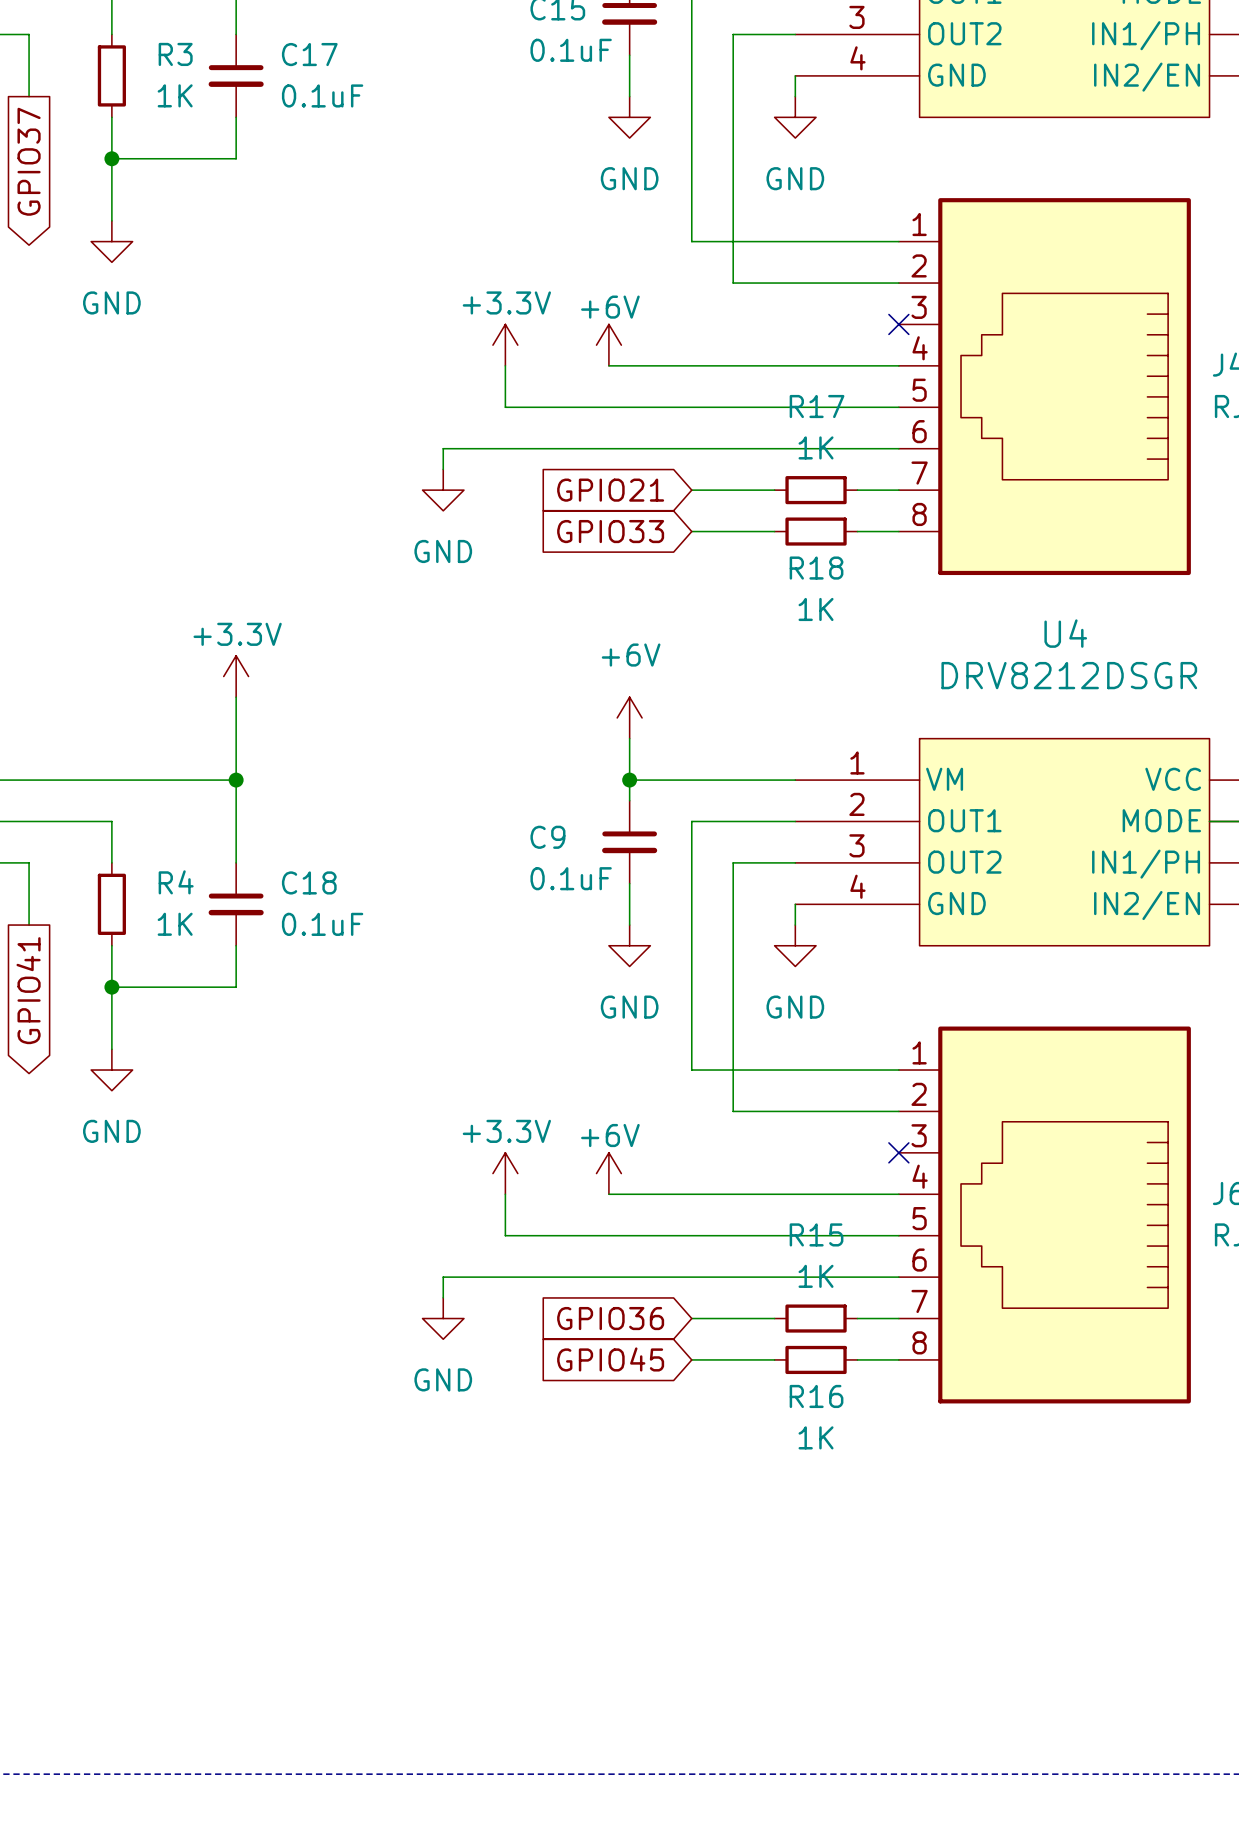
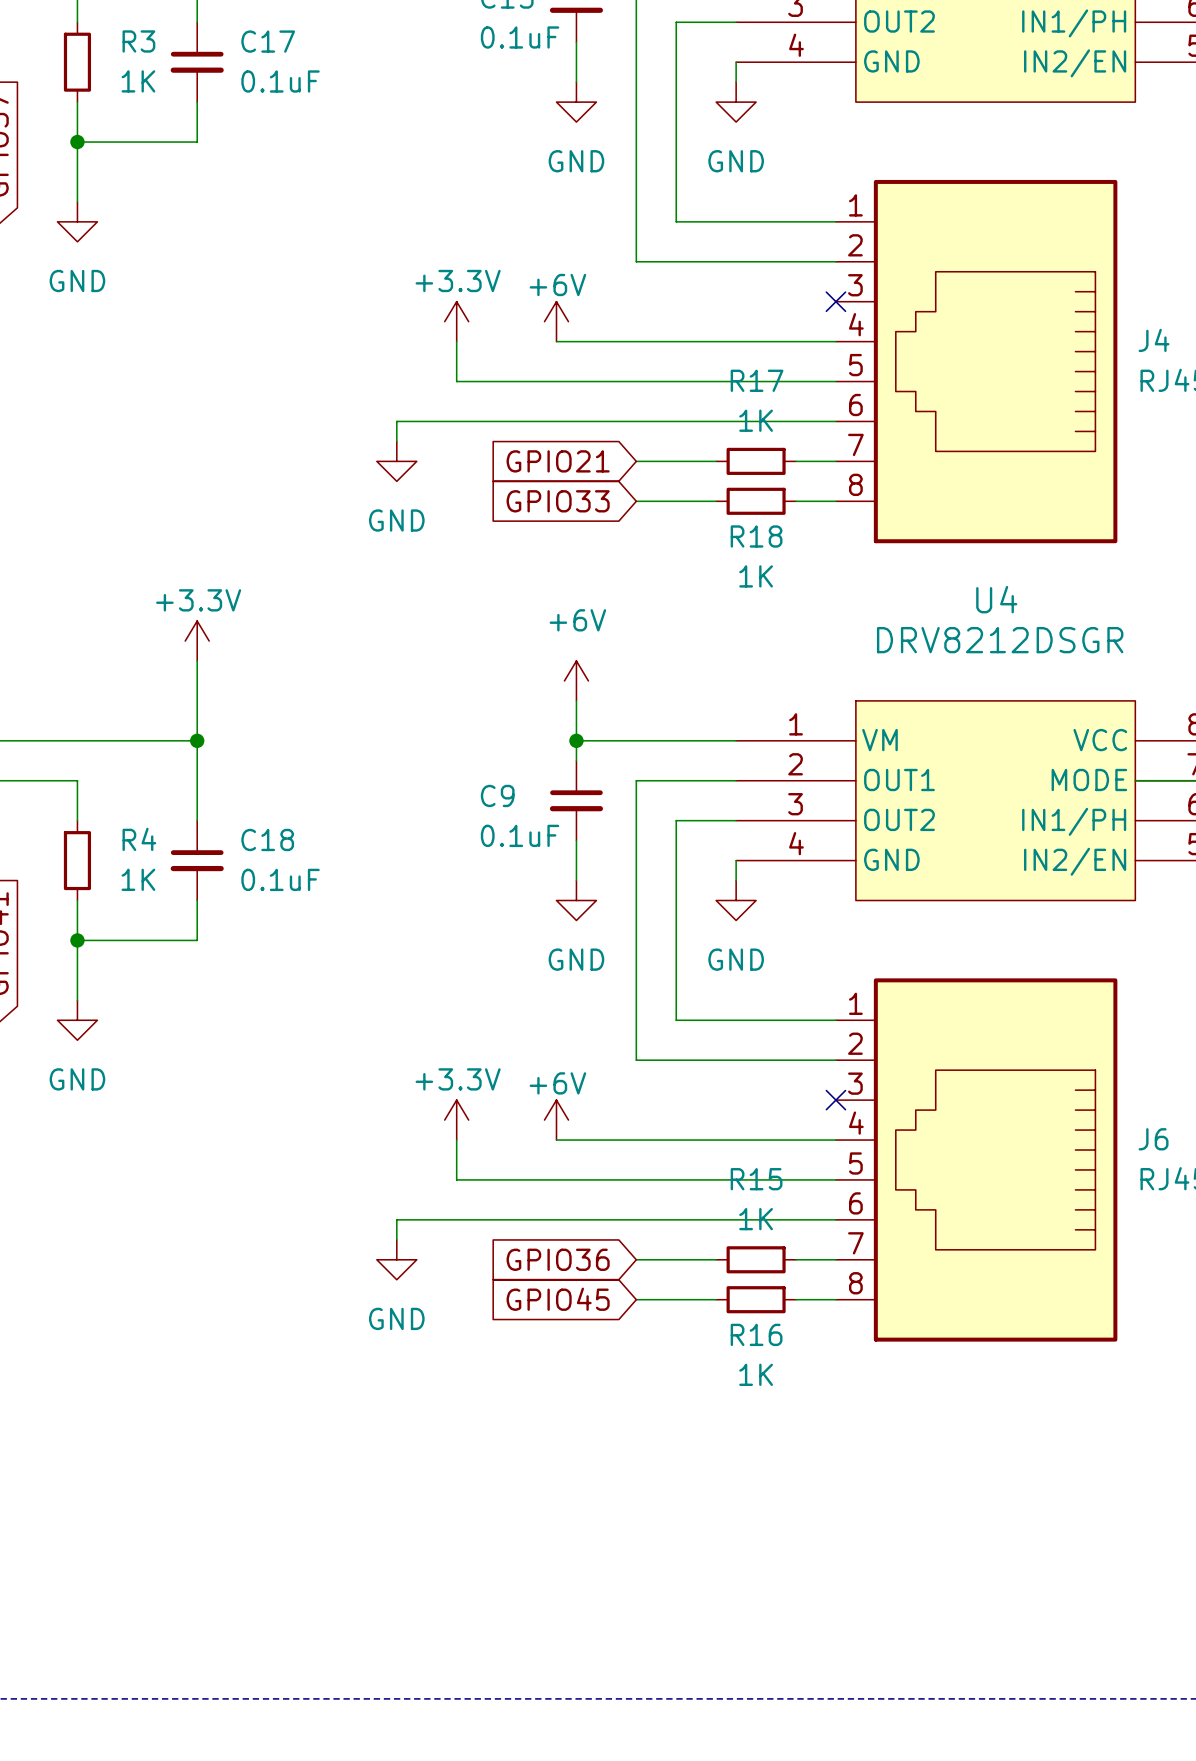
wire: (691, 241) (733, 241) (733, 283) -> (636, 221) (636, 261) (676, 261)
wire: (691, 1070) (733, 1070) (733, 1111) -> (636, 1020) (636, 1060) (676, 1060)

